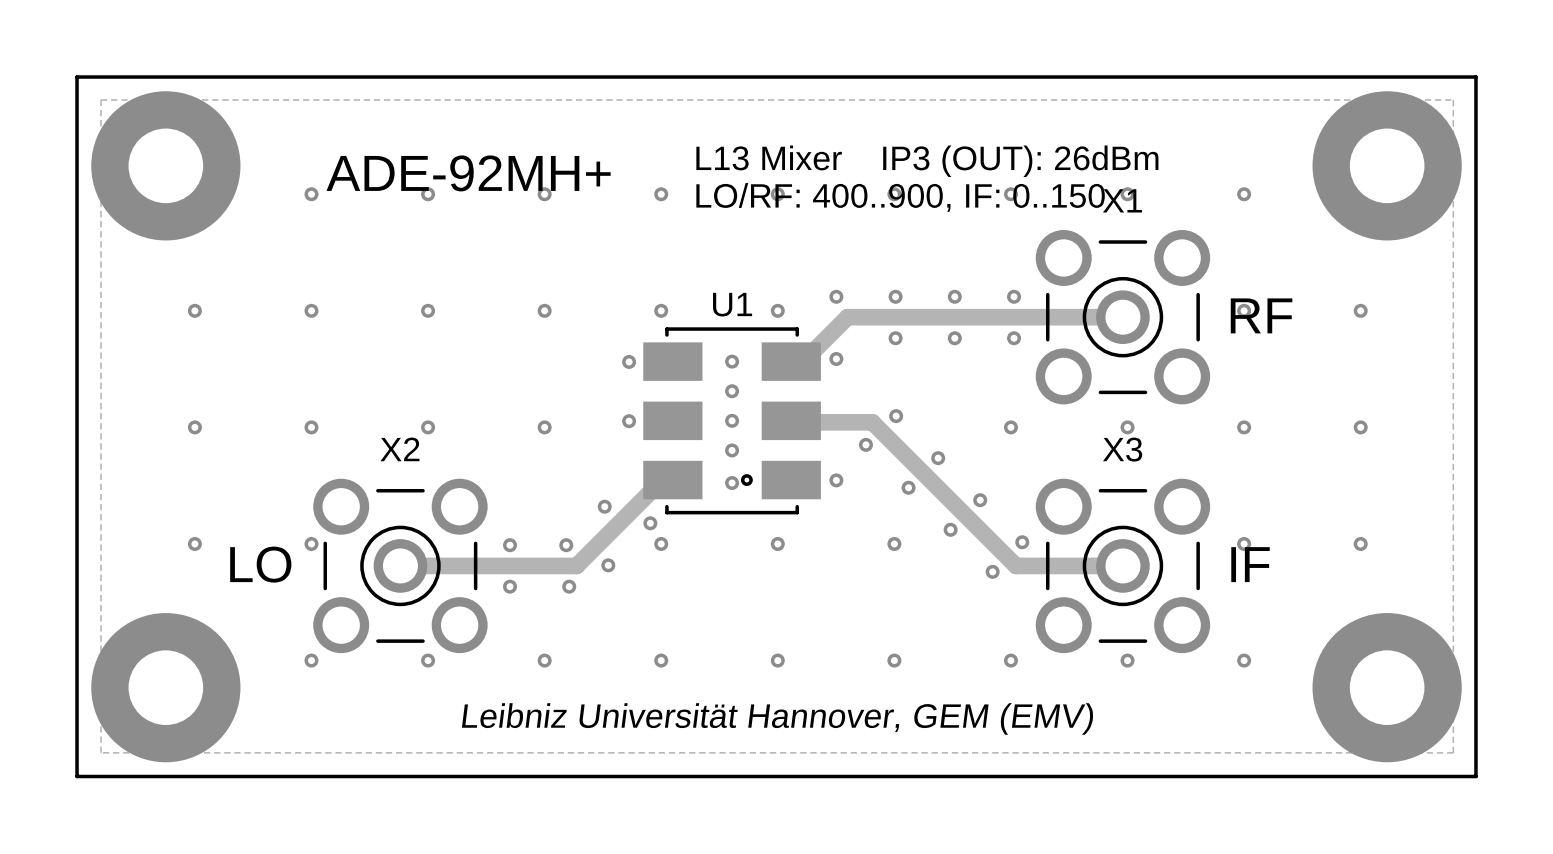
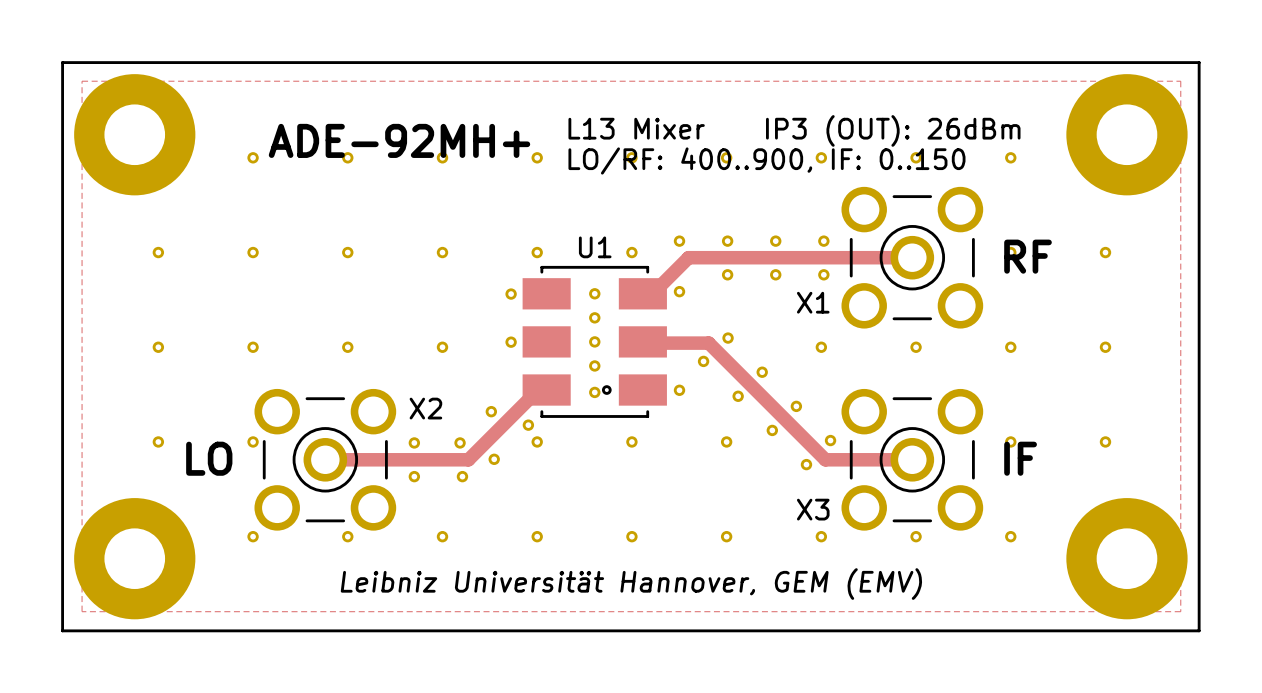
X1 name position: X1 (1122, 200) -> X1 (813, 302)
X2 name position: X2 (399, 449) -> X2 (425, 408)
X3 name position: X3 (1122, 449) -> X3 (813, 509)

